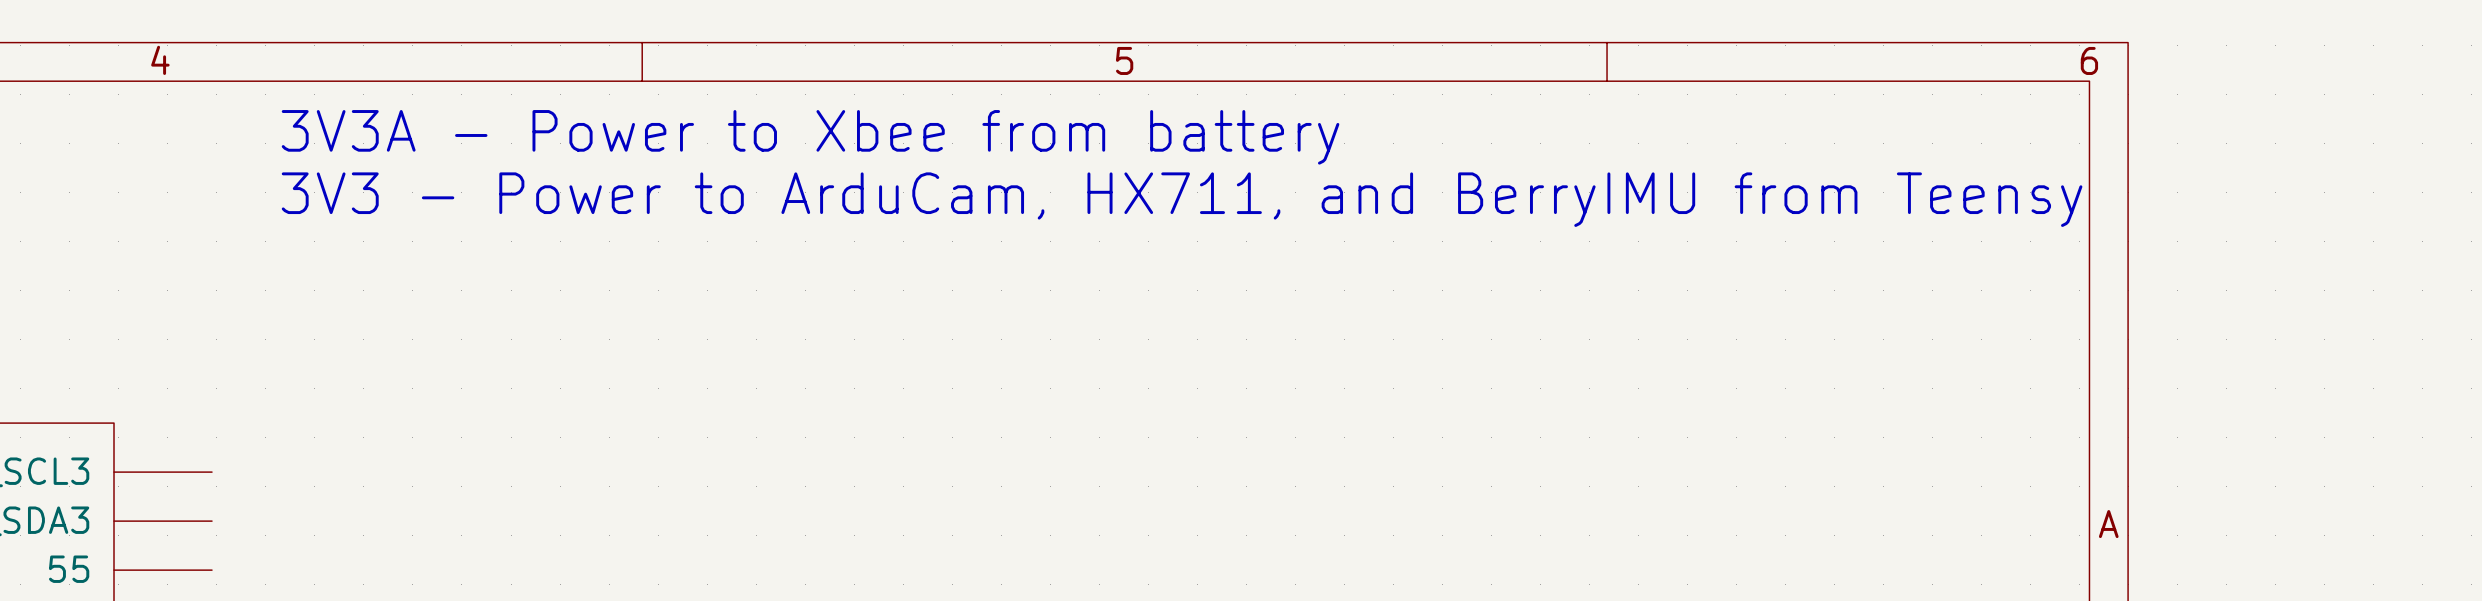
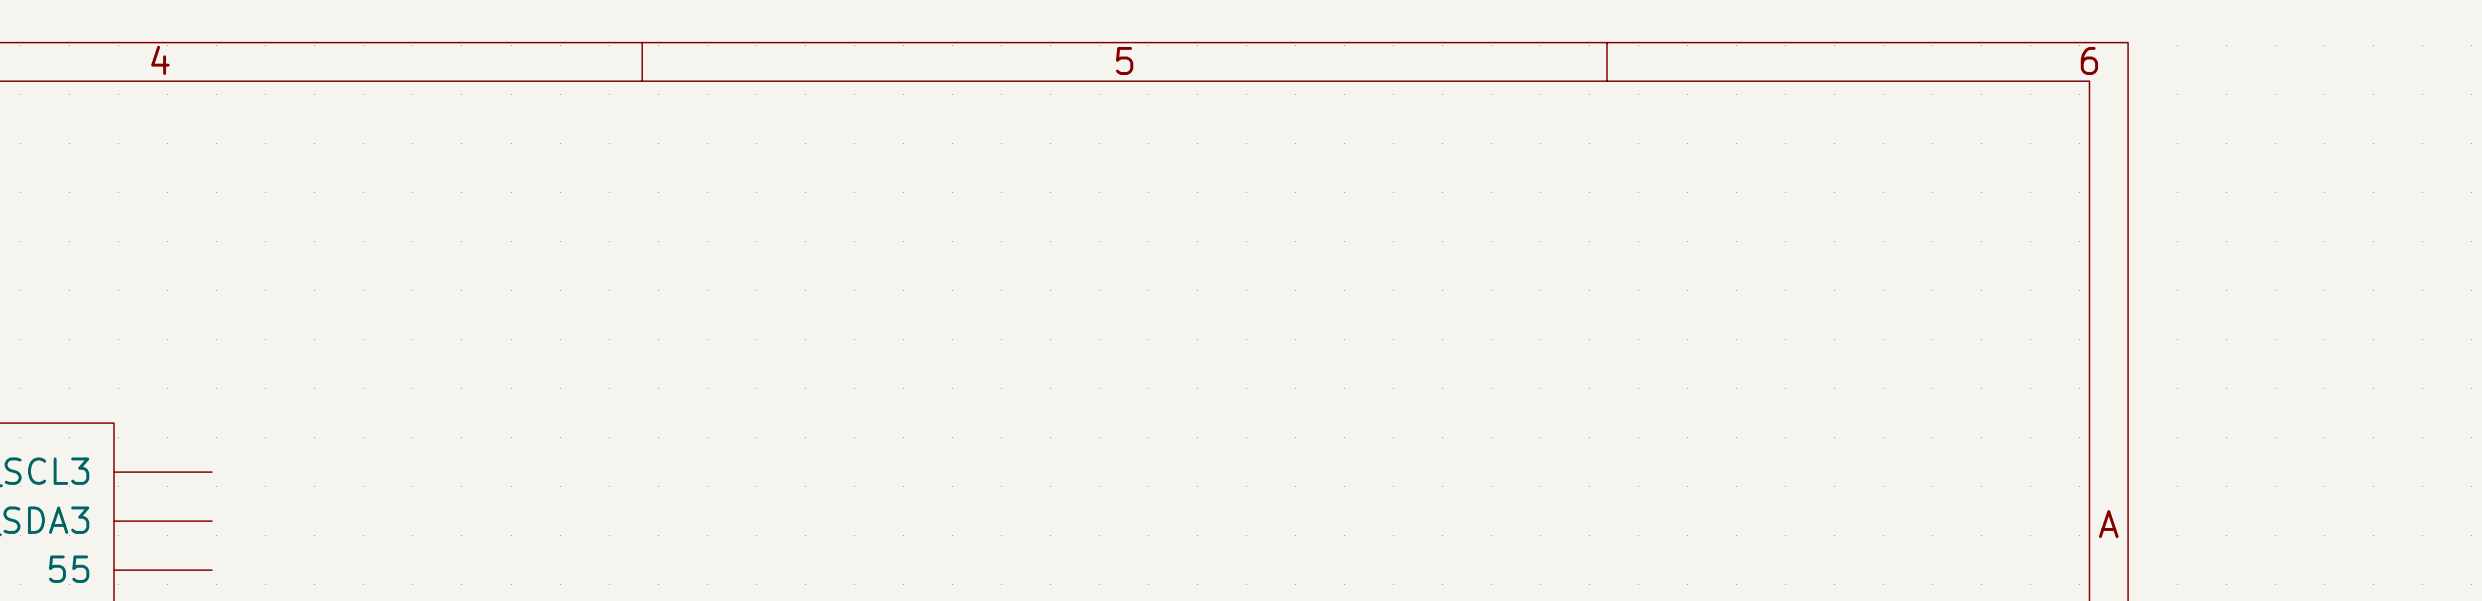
text: 3V3A - Power to Xbee from battery (810, 137) -> none
text: 3V3 - Power to ArduCam, HX711, and BerryIMU from Teensy (1182, 199) -> none

